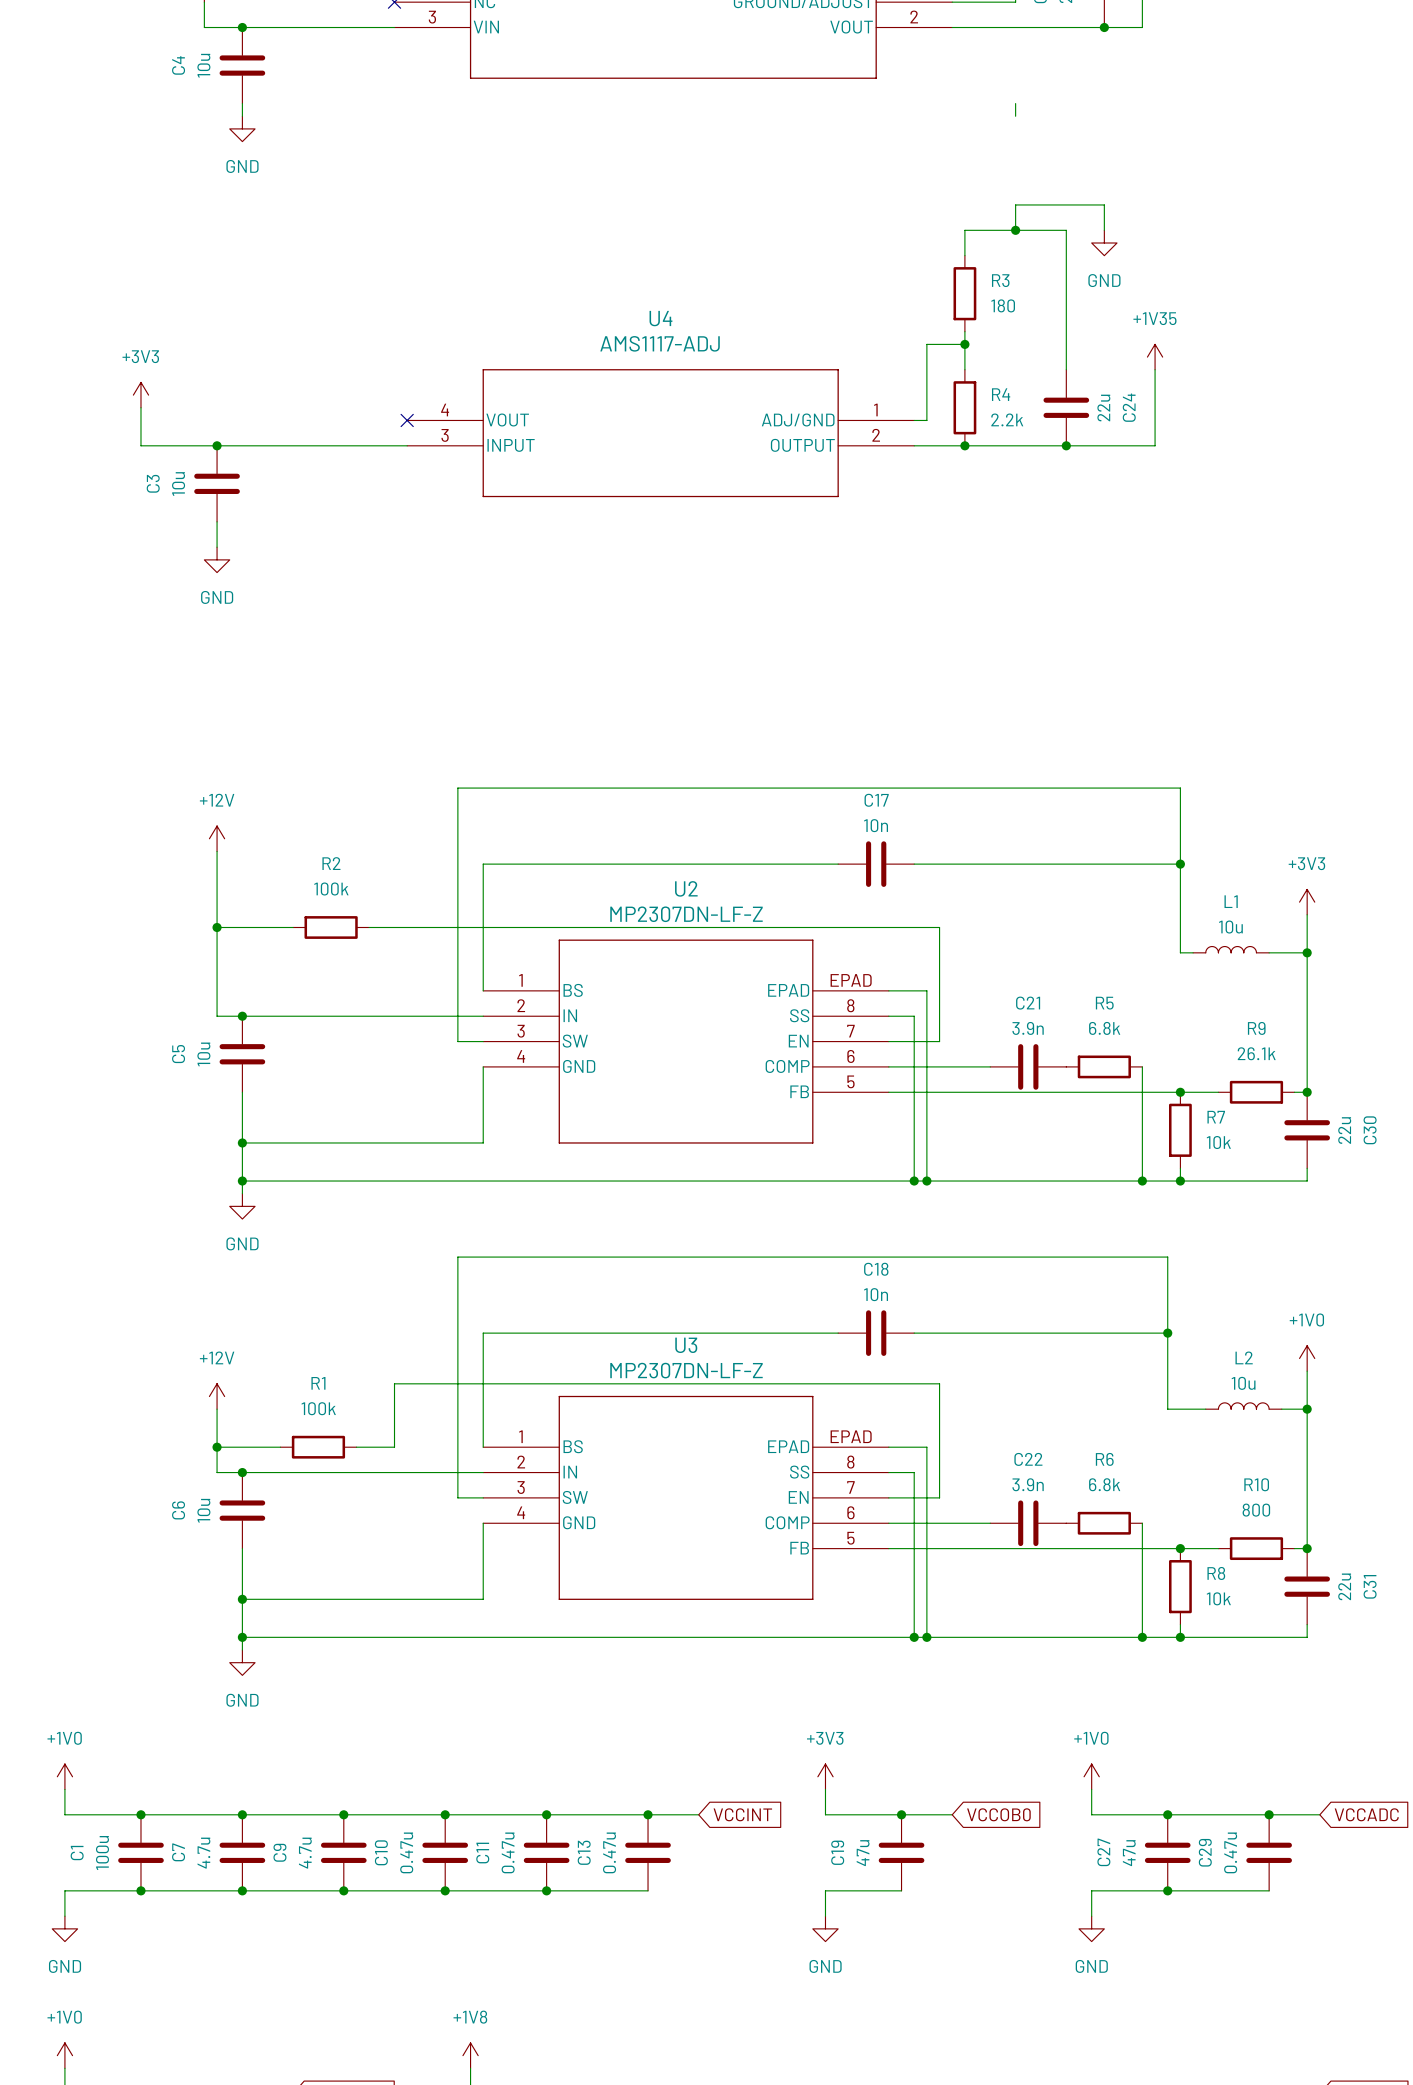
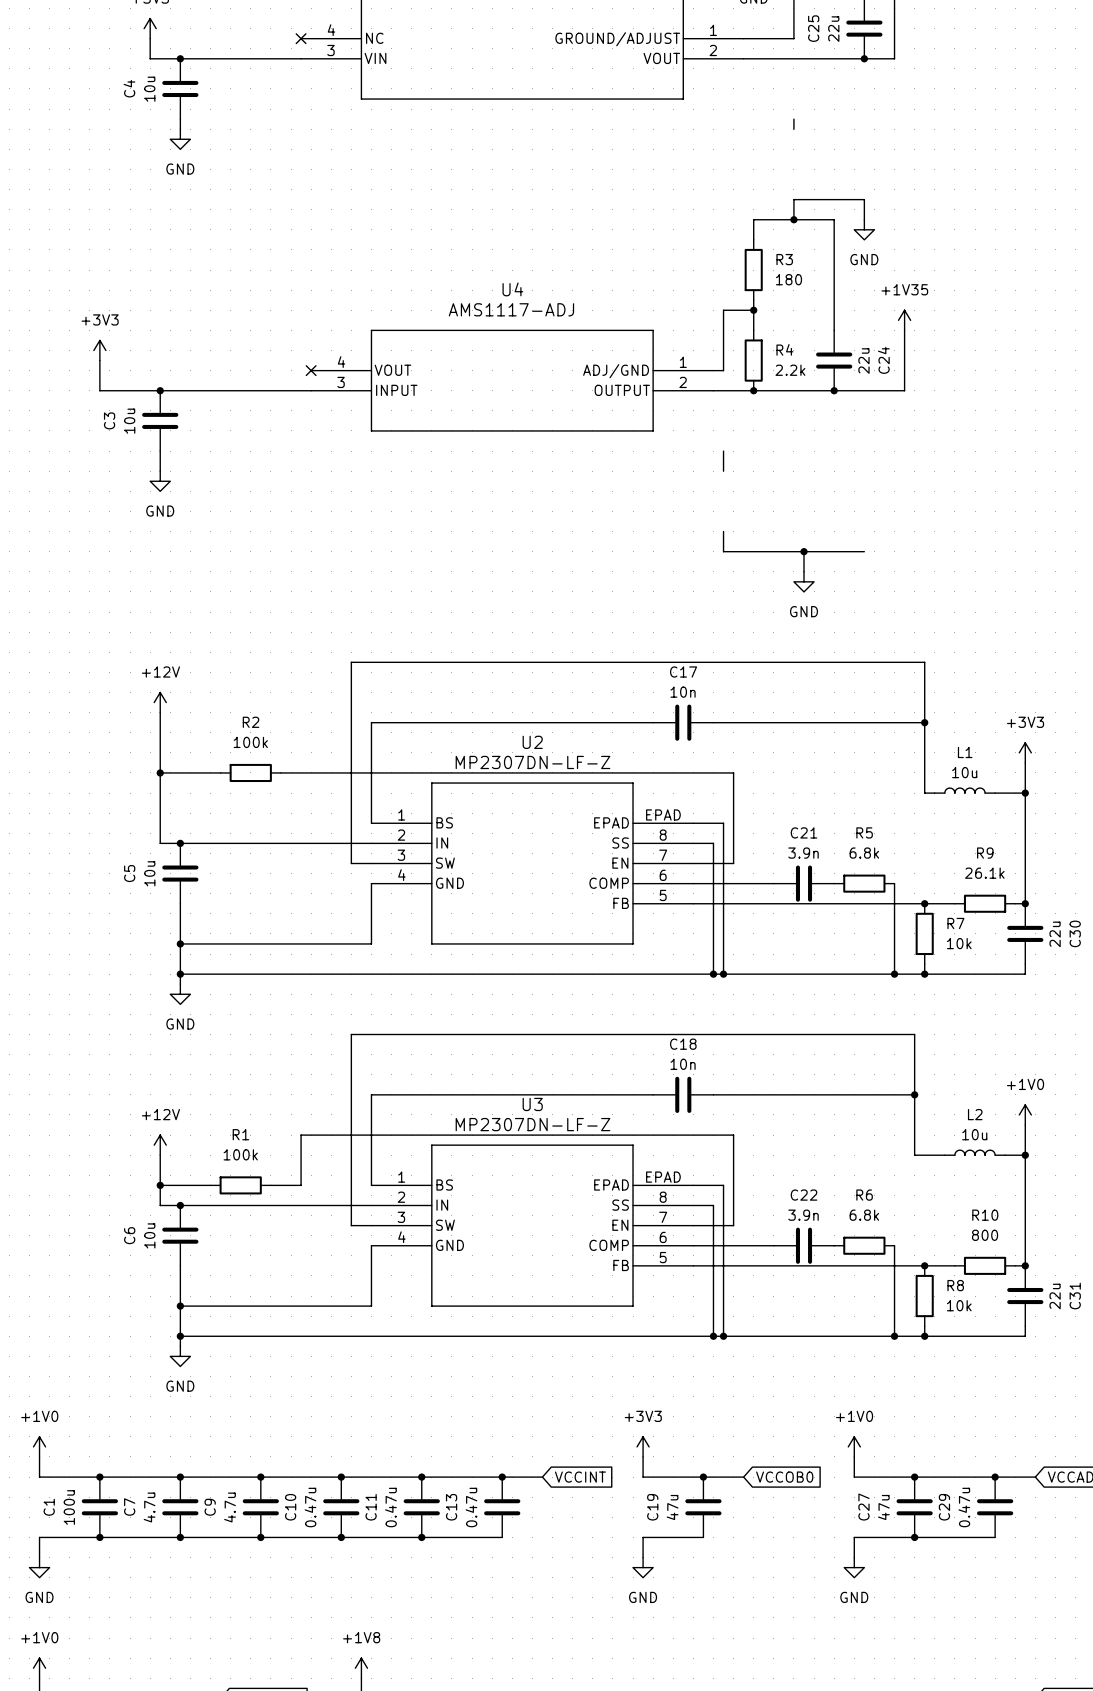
wire: none -> (723, 451) (723, 471)
wire: none -> (723, 531) (723, 551) (864, 551)
wire: none -> (804, 551) (804, 571)
junction: none -> (804, 551)
power symbol: none -> GND (804, 581)

